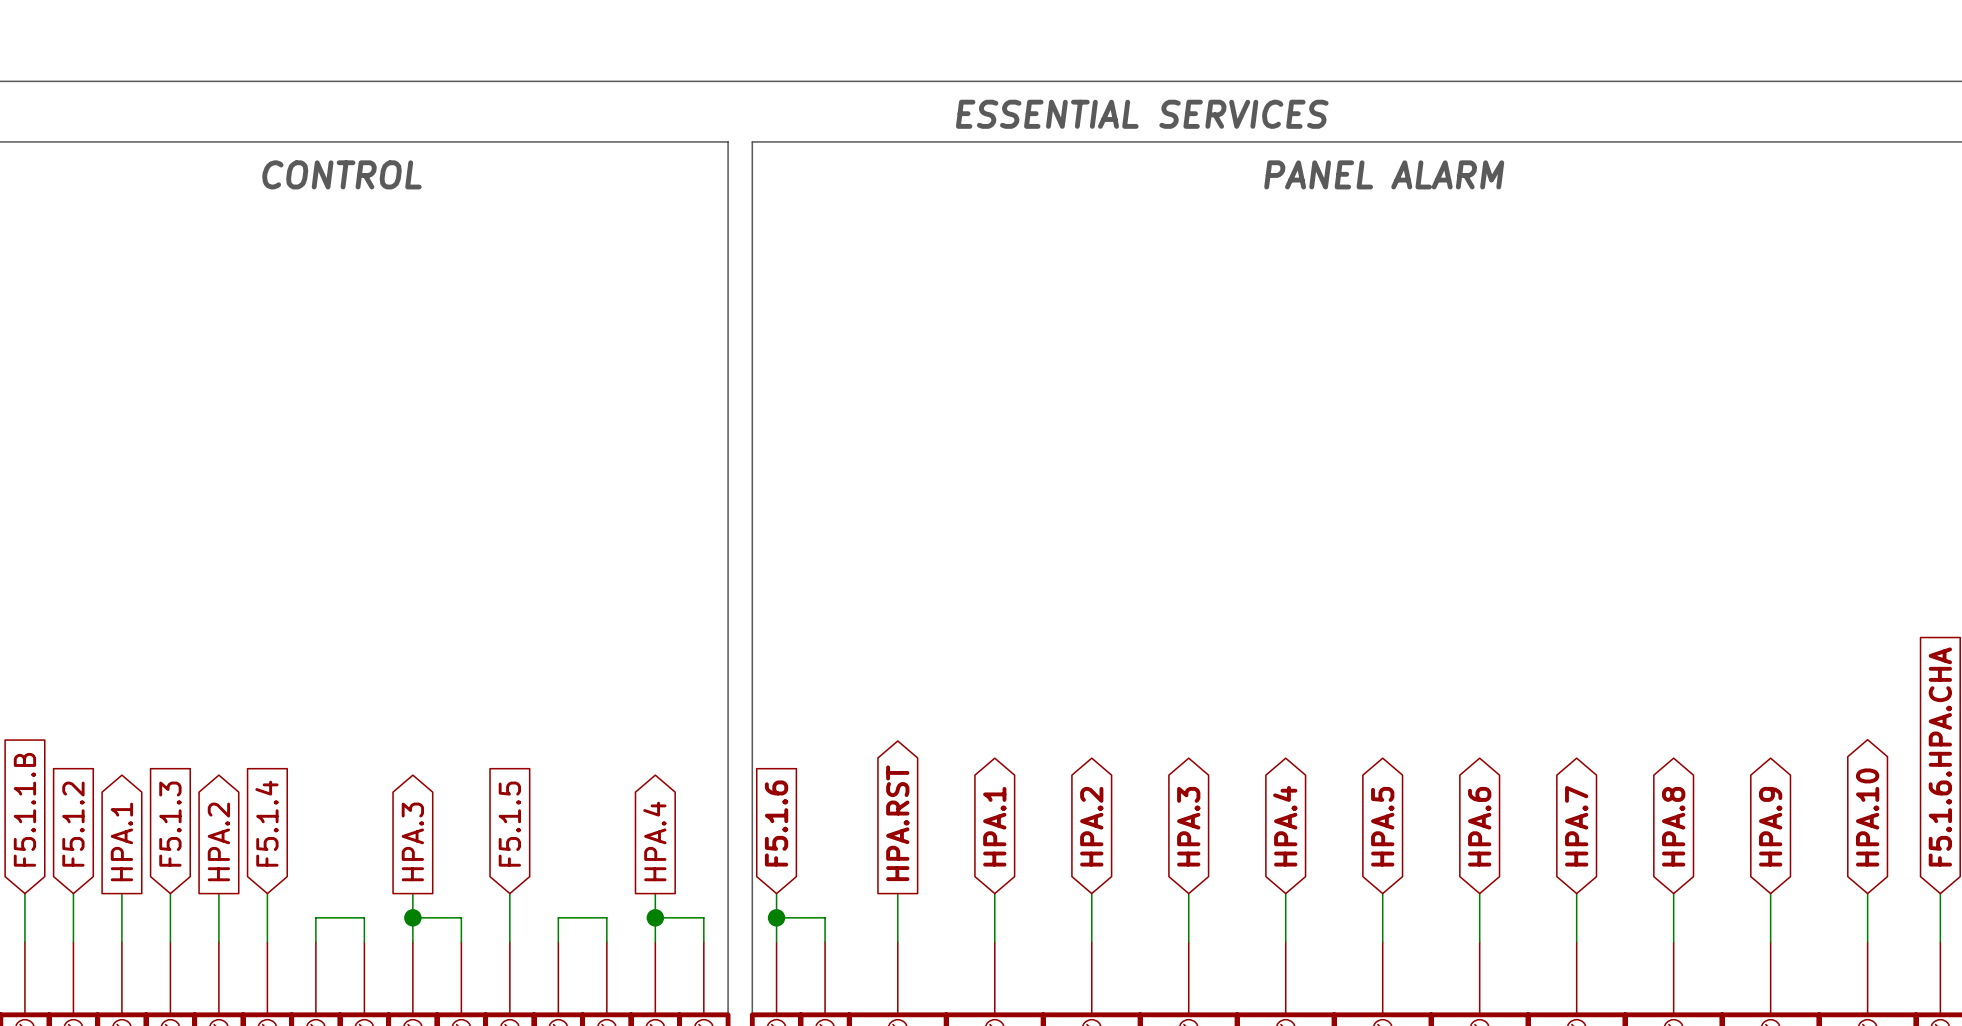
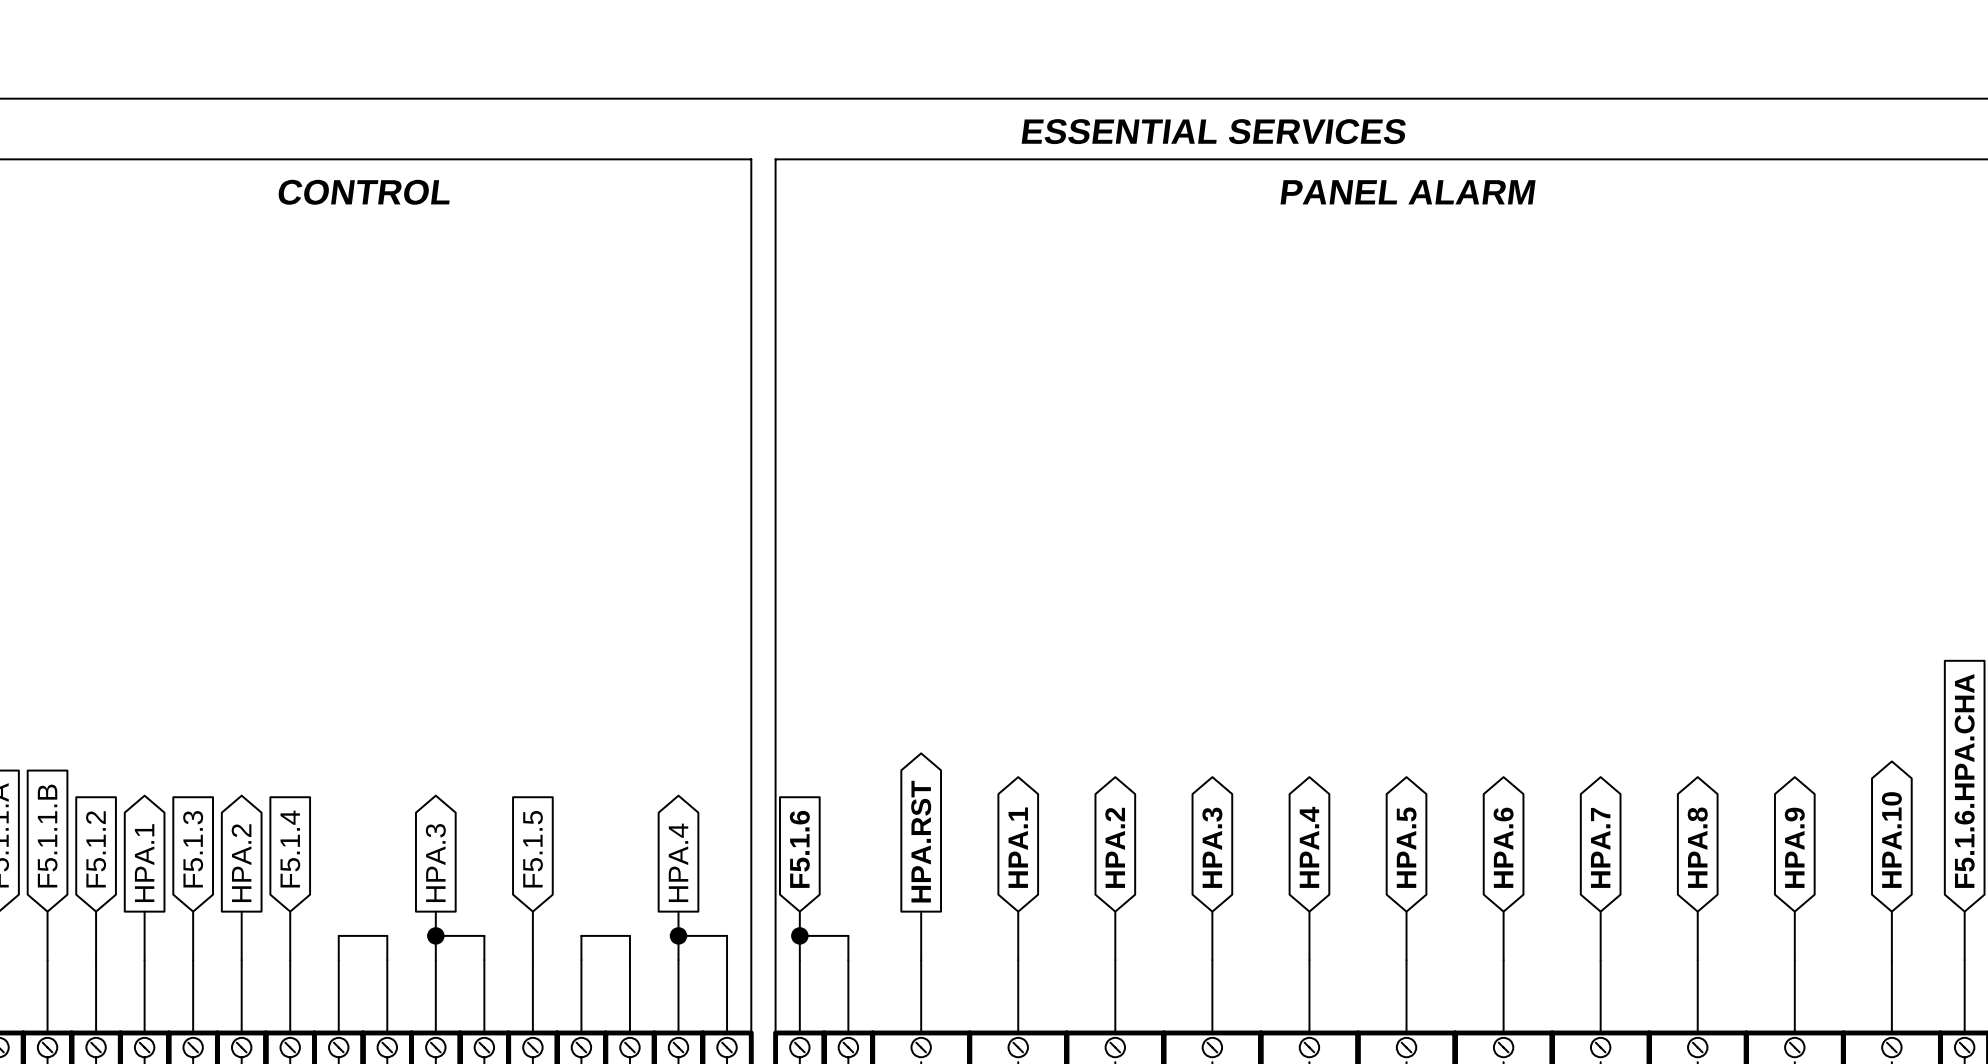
text position: ESSENTIAL SERVICES (1142, 114) -> ESSENTIAL SERVICES (1213, 131)

